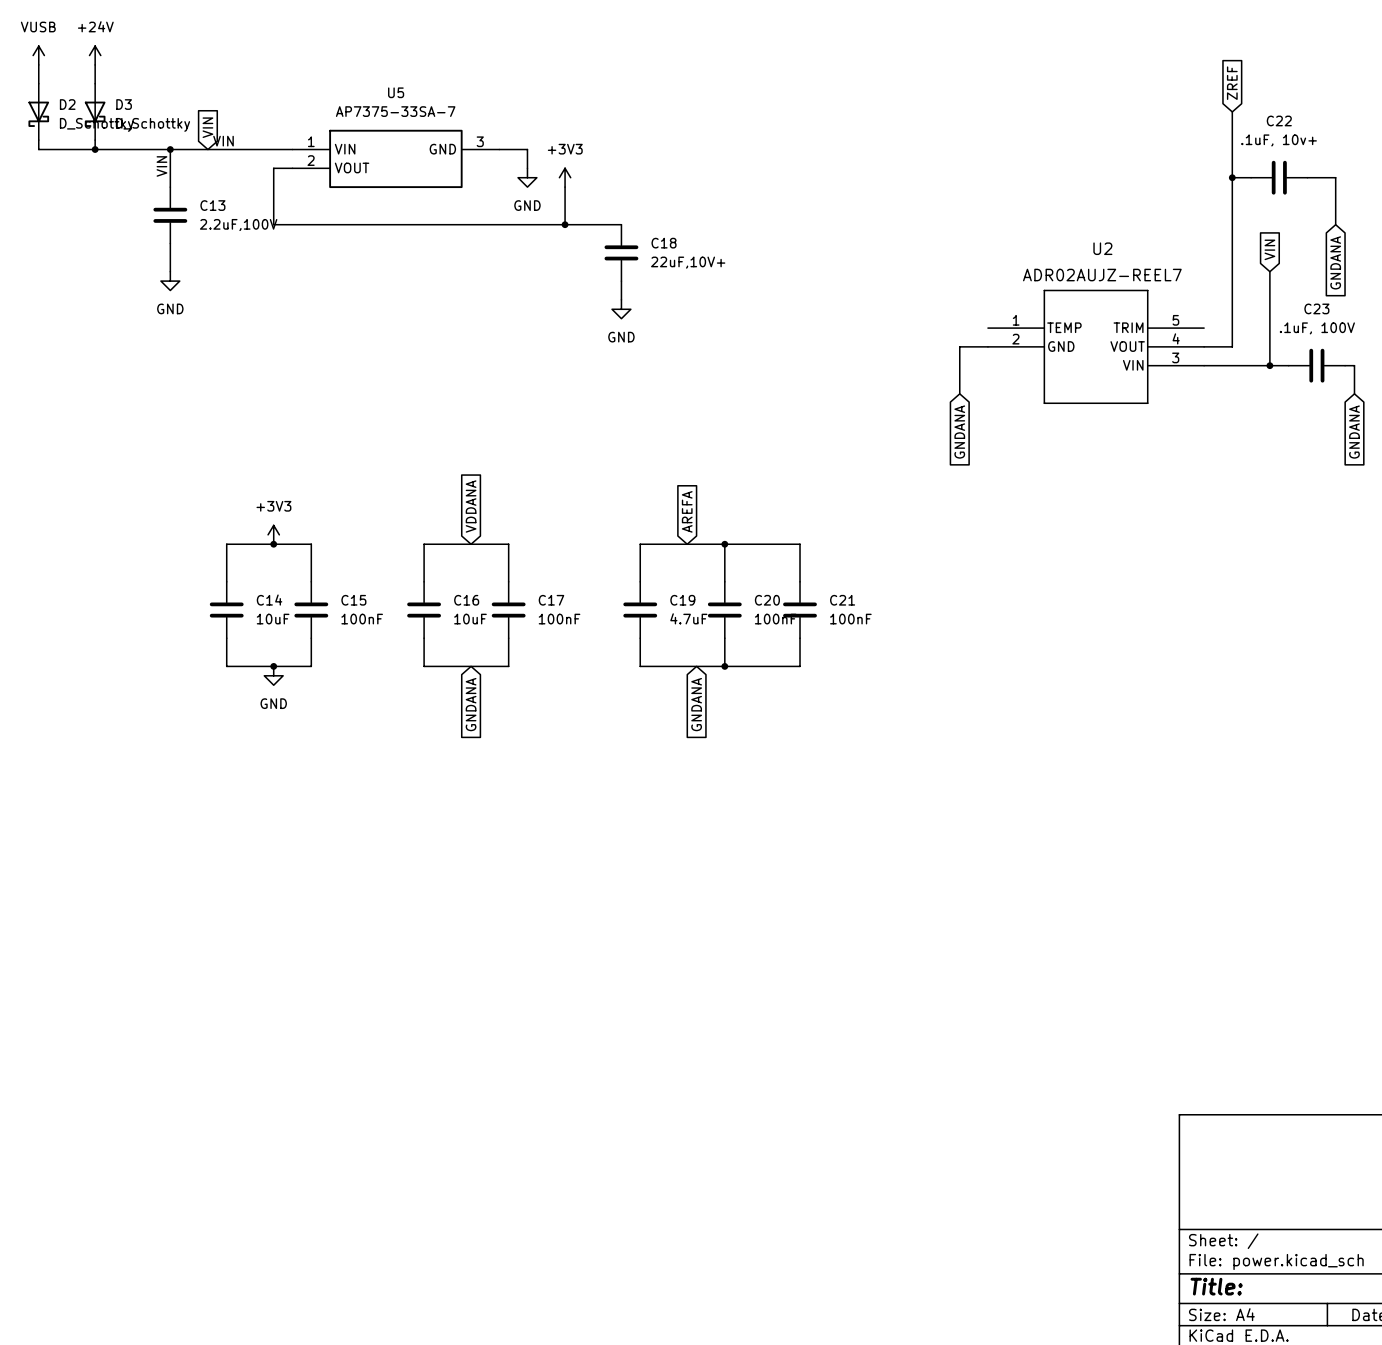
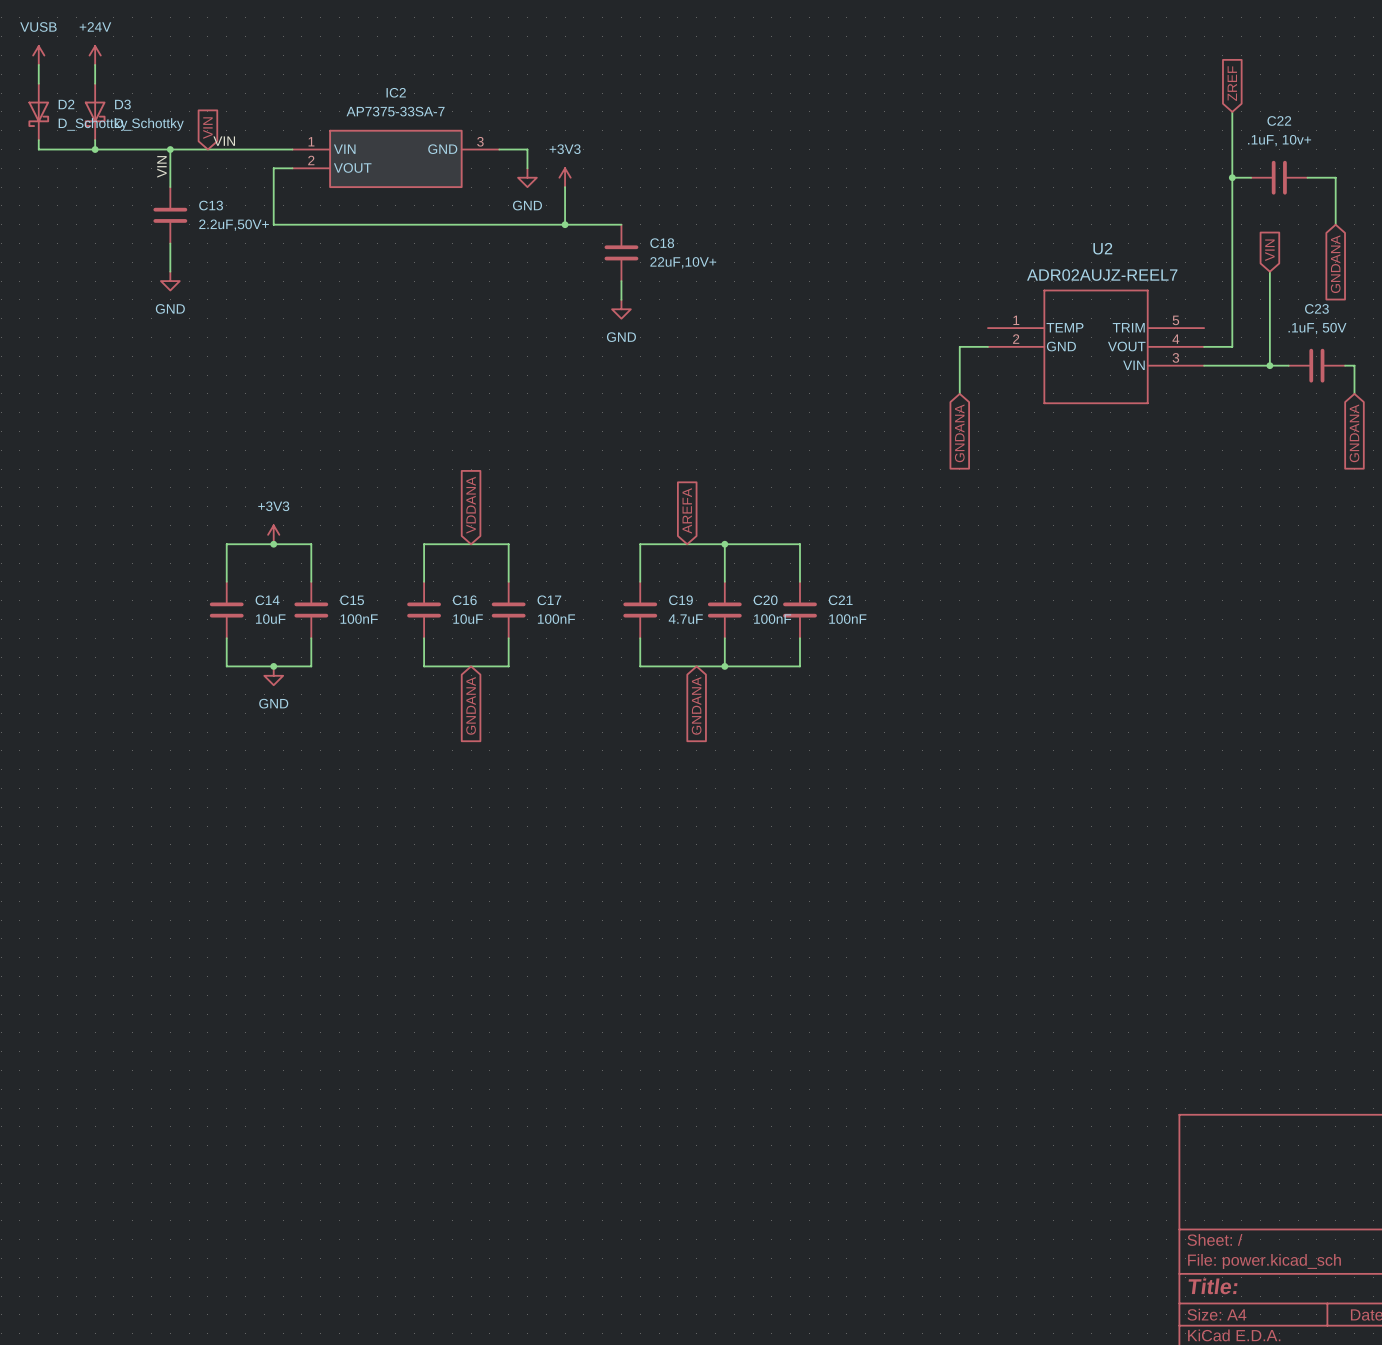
U5 name: U5 (396, 92) -> IC2 (396, 92)
C13 value: 2.2uF,100V (238, 225) -> 2.2uF,50V+ (234, 225)
C23 value: .1uF, 100V (1317, 328) -> .1uF, 50V (1317, 328)

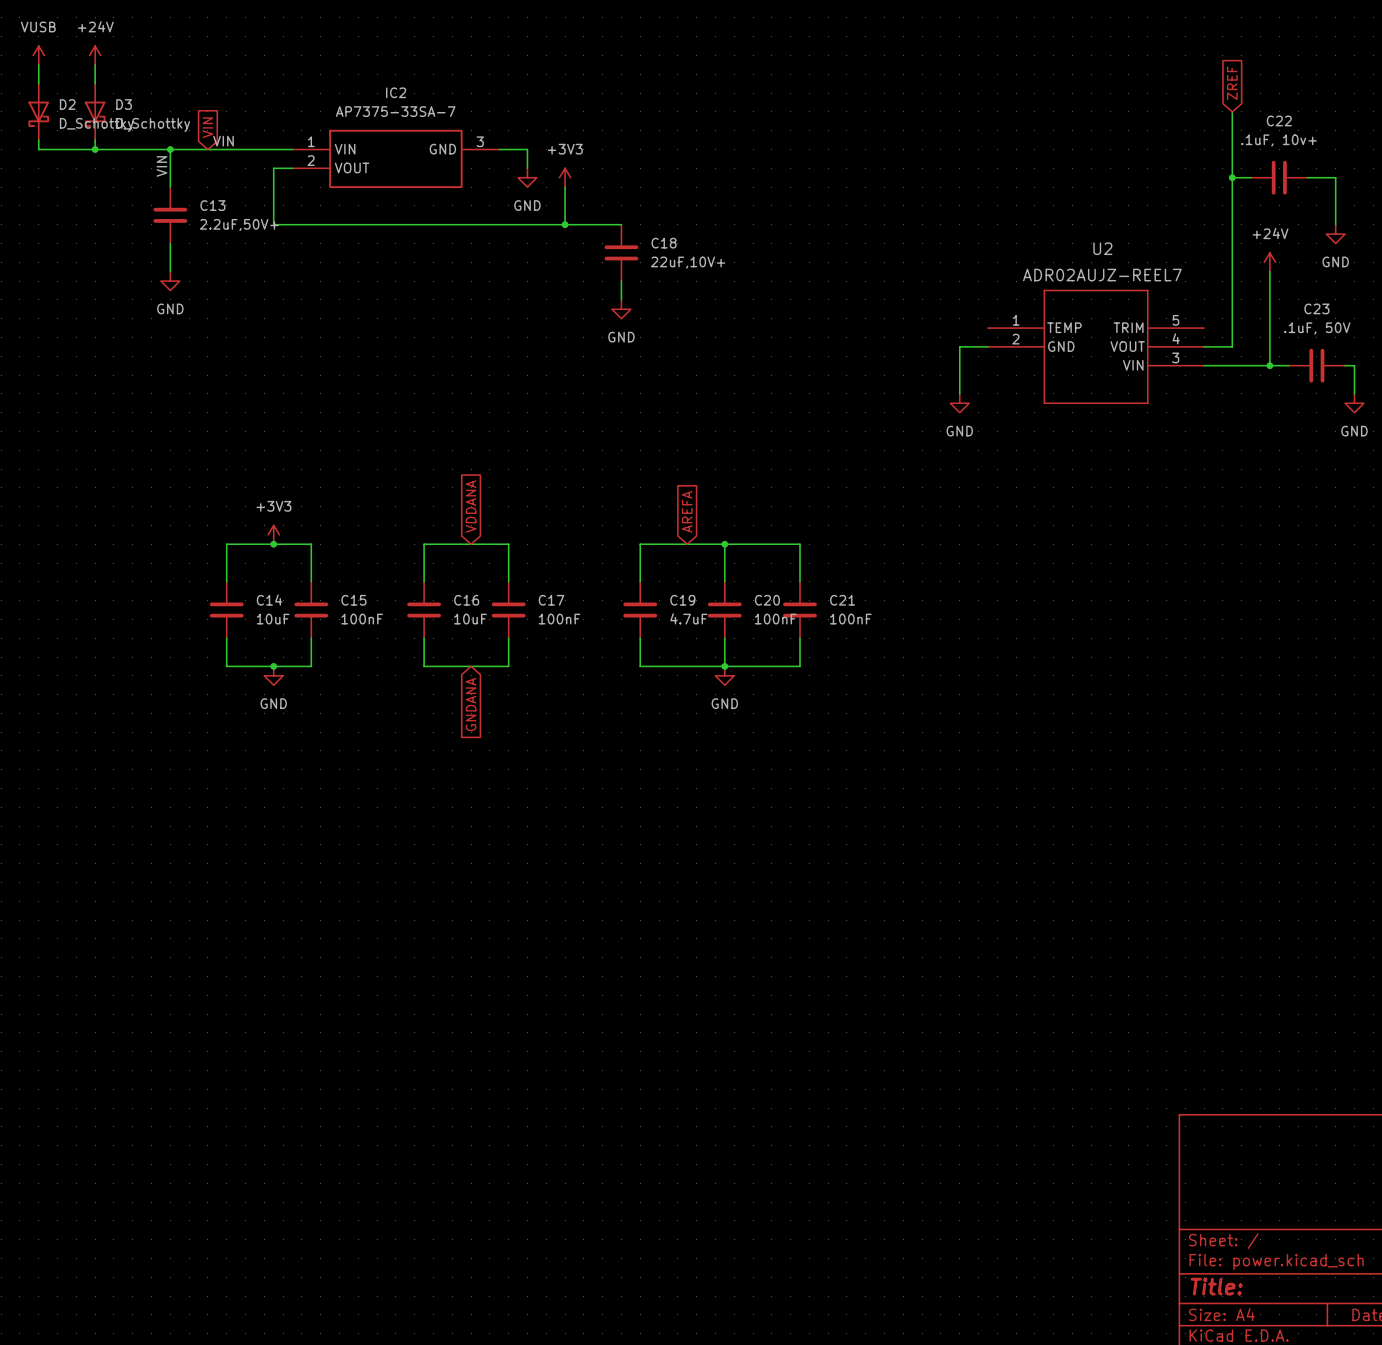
power symbol: none -> GND (1335, 234)
global label: VIN (1269, 250) -> none
power symbol: none -> +24V (1269, 262)
global label: GNDANA (1335, 264) -> none
power symbol: none -> GND (959, 403)
power symbol: none -> GND (1354, 403)
global label: GNDANA (959, 433) -> none
global label: GNDANA (1354, 433) -> none
power symbol: none -> GND (724, 675)
global label: GNDANA (696, 705) -> none

